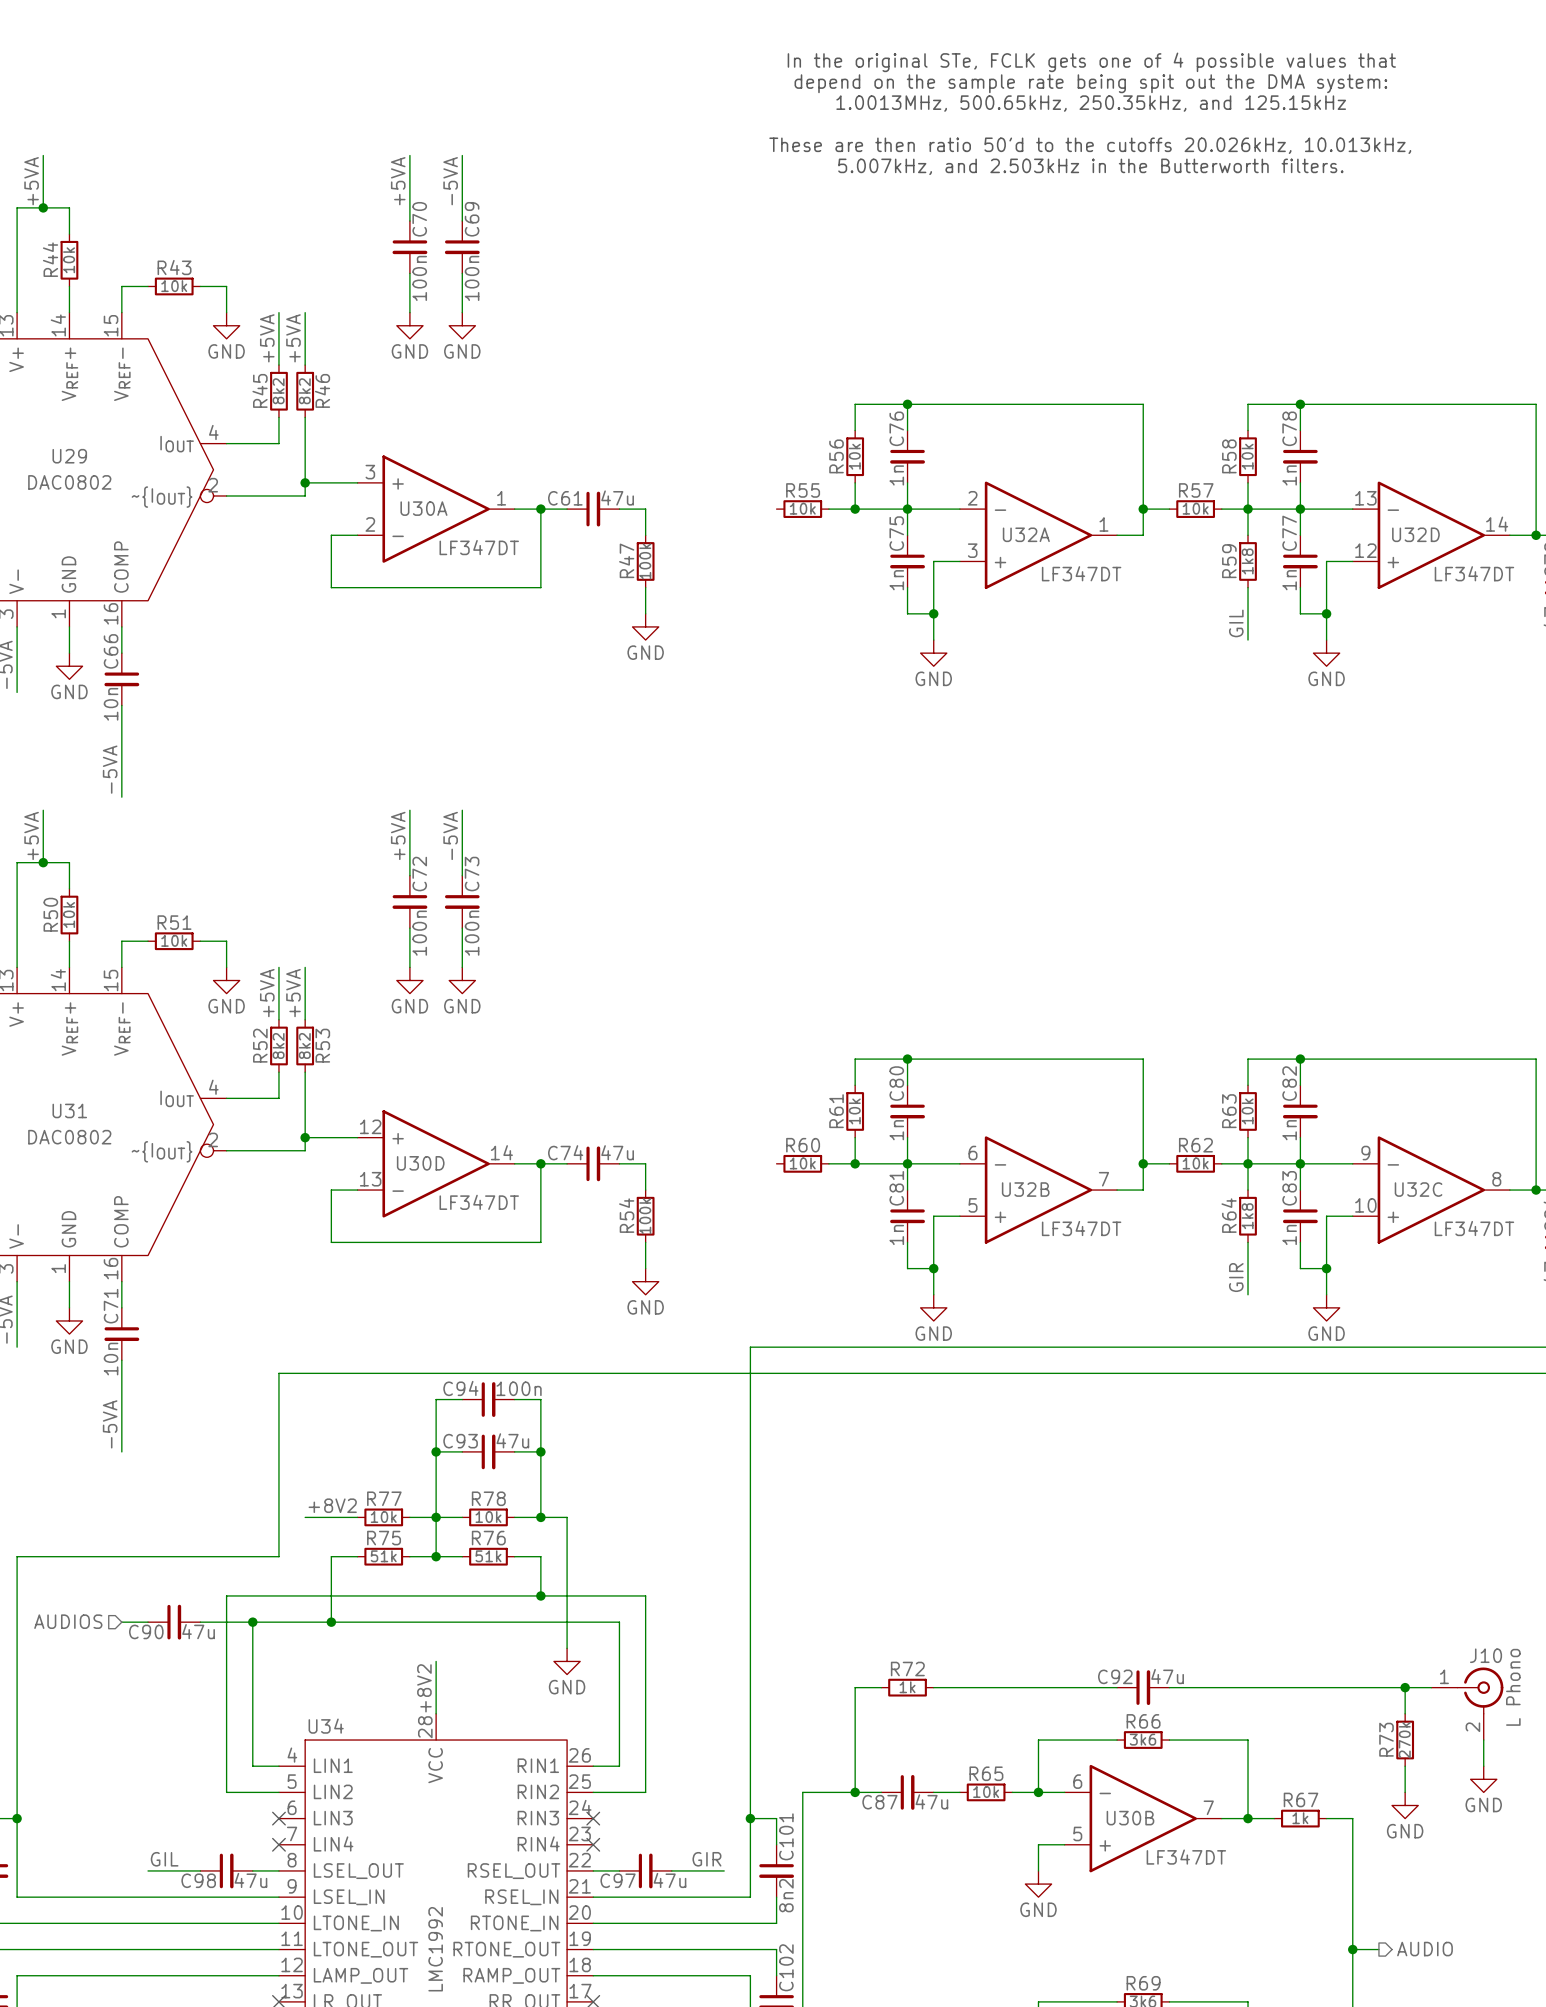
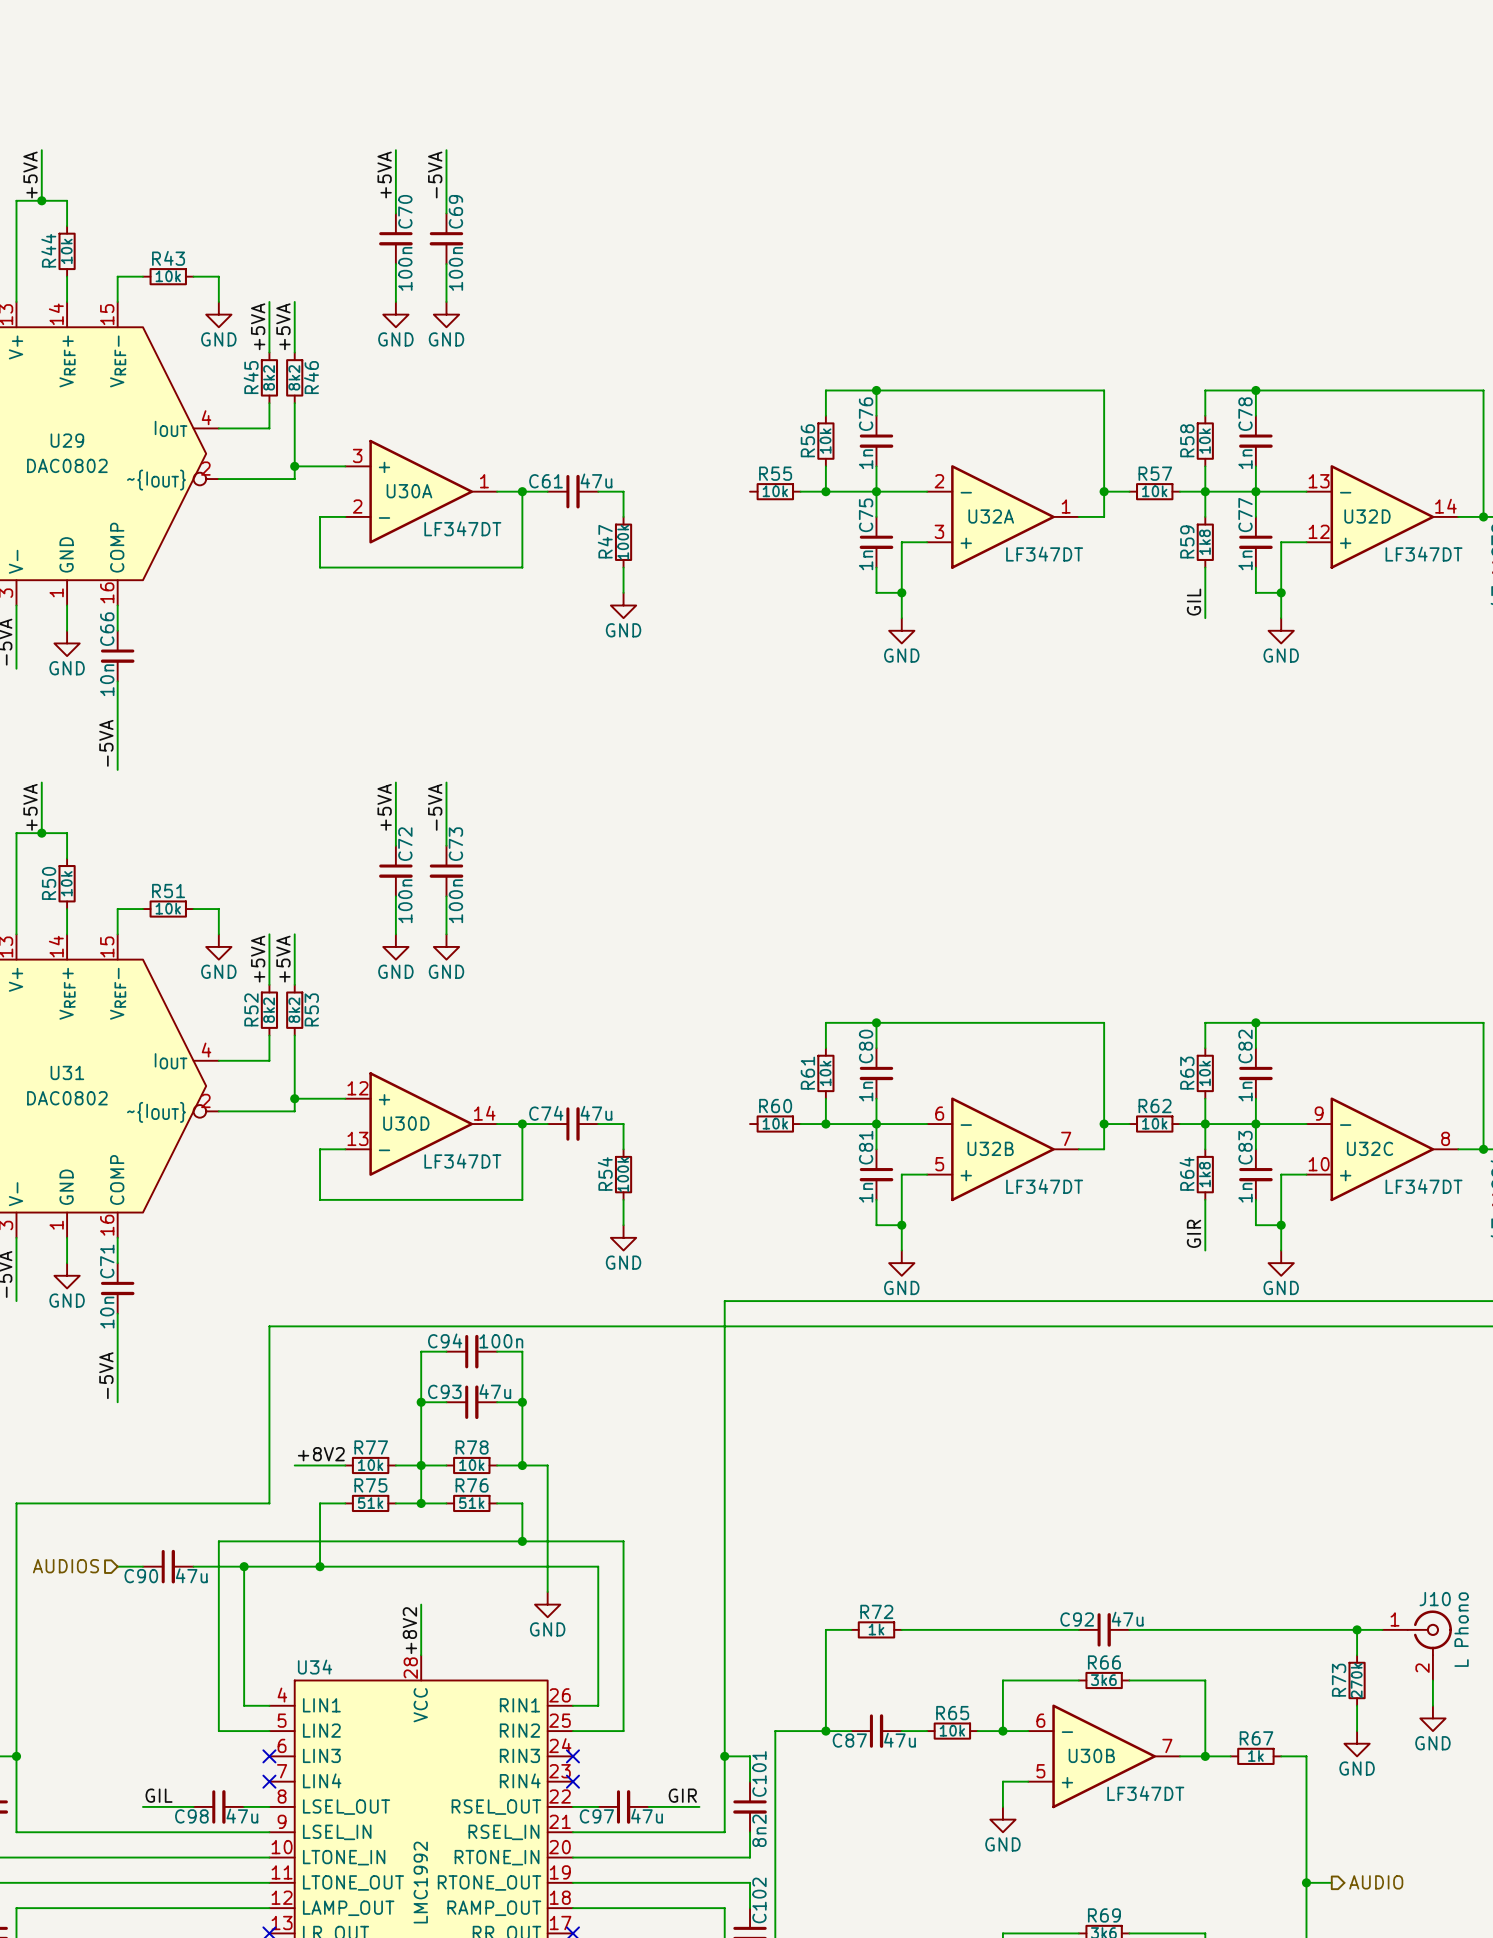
text: In the original STe, FCLK gets one of 4 possible values that (1091, 62) -> none
text: depend on the sample rate being spit out the DMA system: (1090, 83) -> none
text: 1.0013MHz, 500.65kHz, 250.35kHz, and 125.15kHz (1091, 103) -> none
text: These are then ratio 50'd to the cutoffs 20.026kHz, 10.013kHz, (1090, 145) -> none
text: 5.007kHz, and 2.503kHz in the Butterworth filters. (1090, 166) -> none

